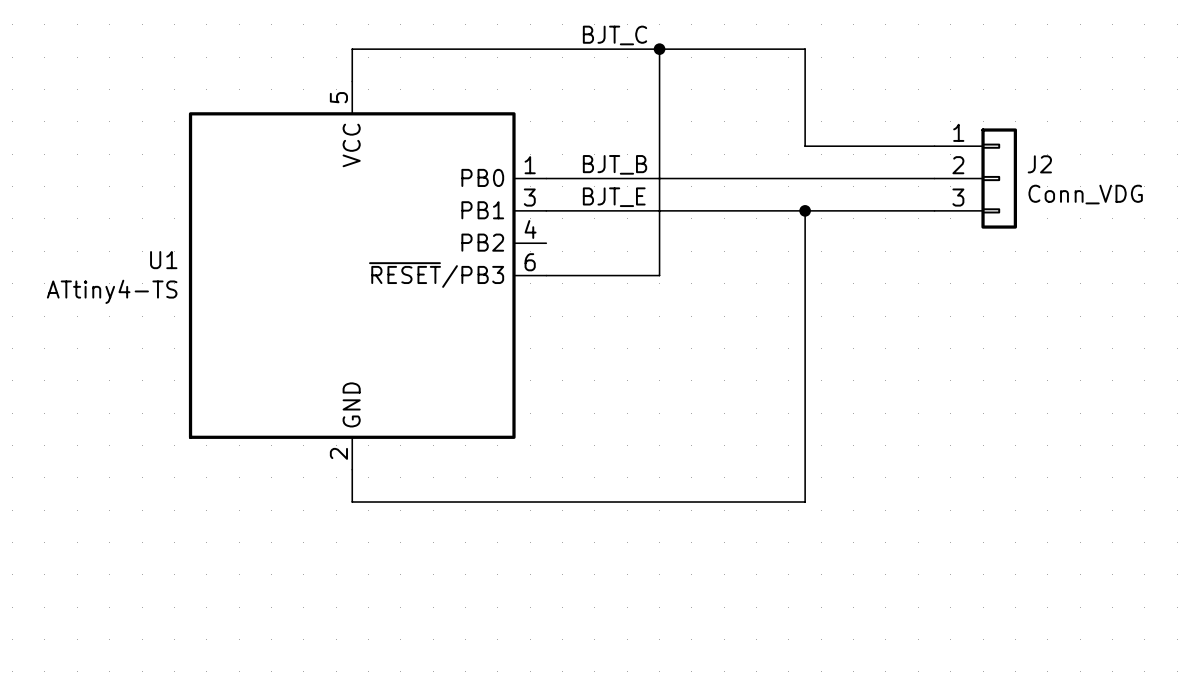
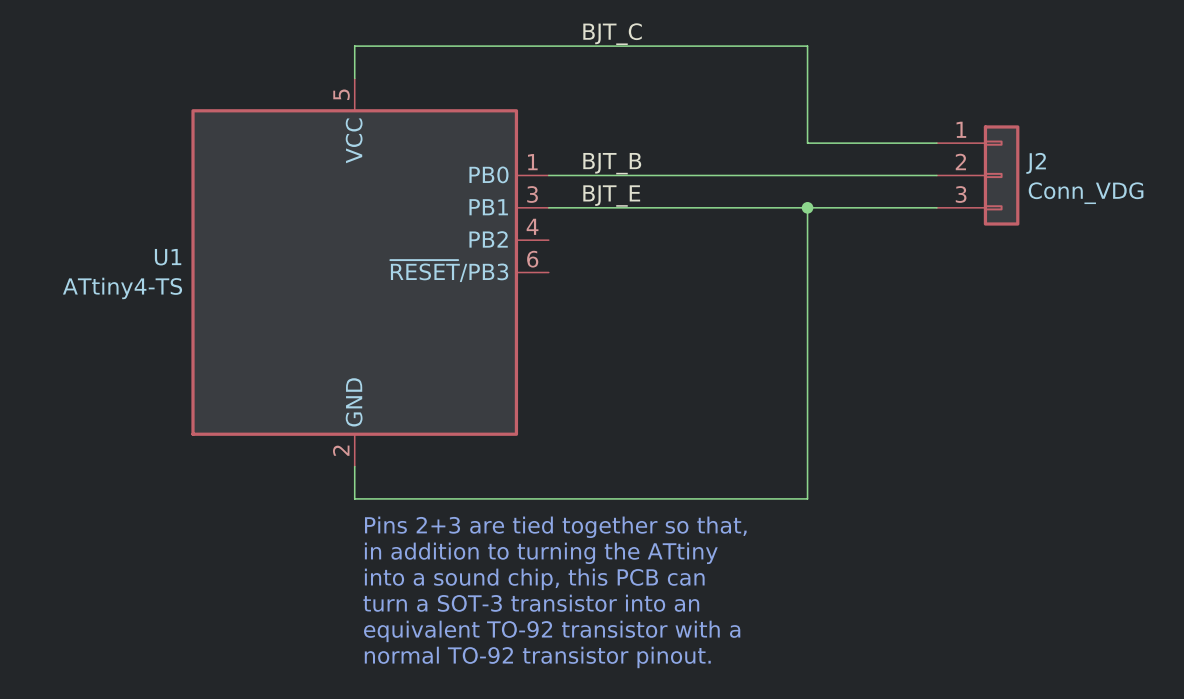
wire: (659, 49) (659, 275) (546, 275) -> none
junction: (659, 49) -> none
text: none -> Pins 2+3 are tied together so that, (555, 527)
text: none -> in addition to turning the ATtiny (541, 553)
text: none -> into a sound chip, this PCB can (534, 579)
text: none -> turn a SOT-3 transistor into an (531, 603)
text: none -> equivalent TO-92 transistor with a (552, 631)
text: none -> normal TO-92 transistor pinout. (537, 657)

